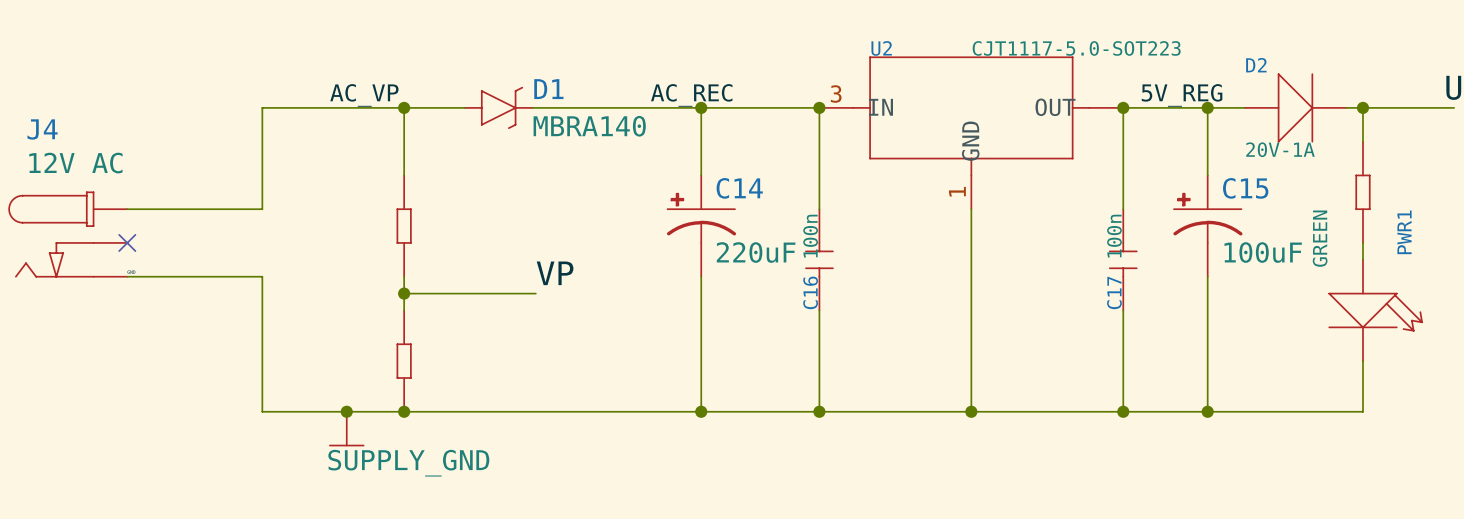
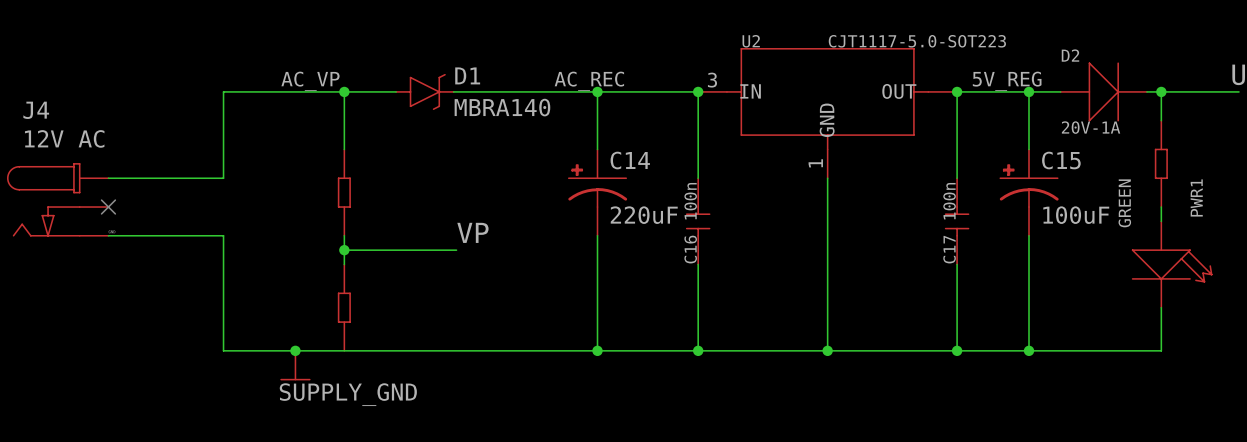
junction: (404, 411) -> none

